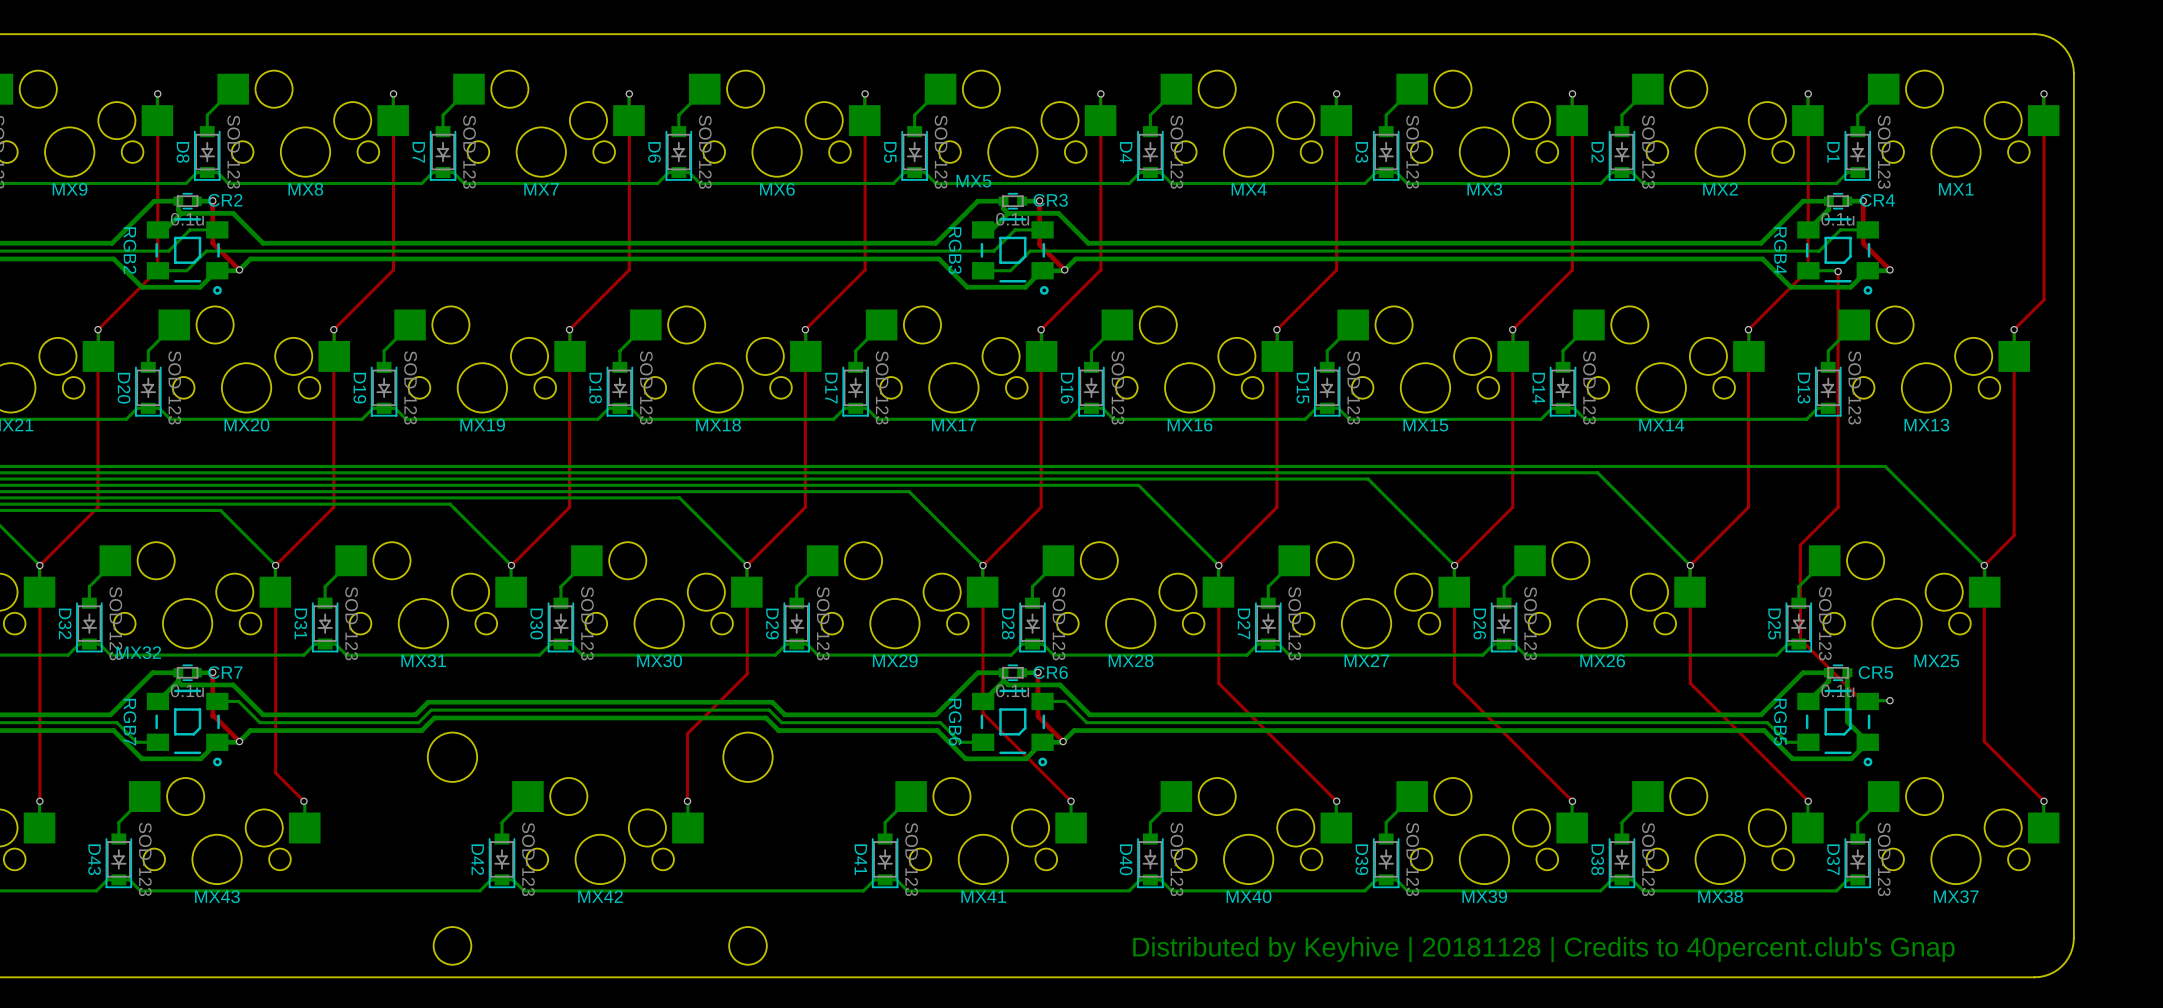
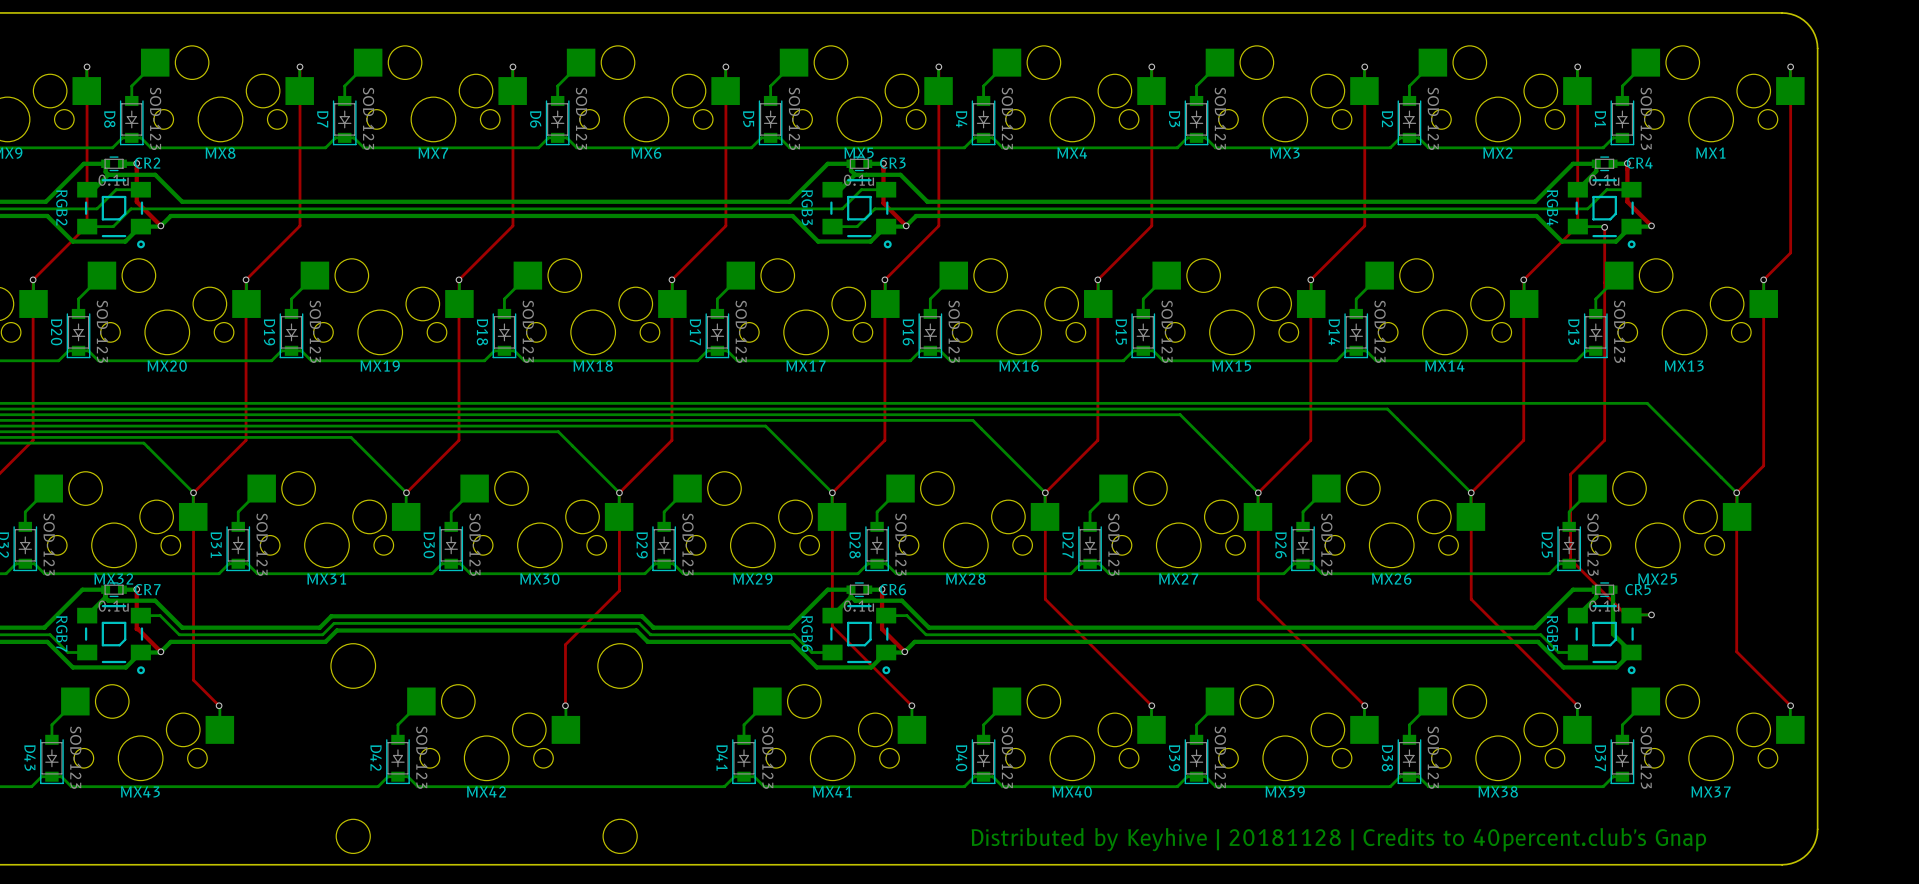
MX5 name position: MX5 (973, 181) -> MX5 (859, 153)
MX32 name position: MX32 (138, 652) -> MX32 (113, 578)
MX25 name position: MX25 (1936, 660) -> MX25 (1657, 578)

